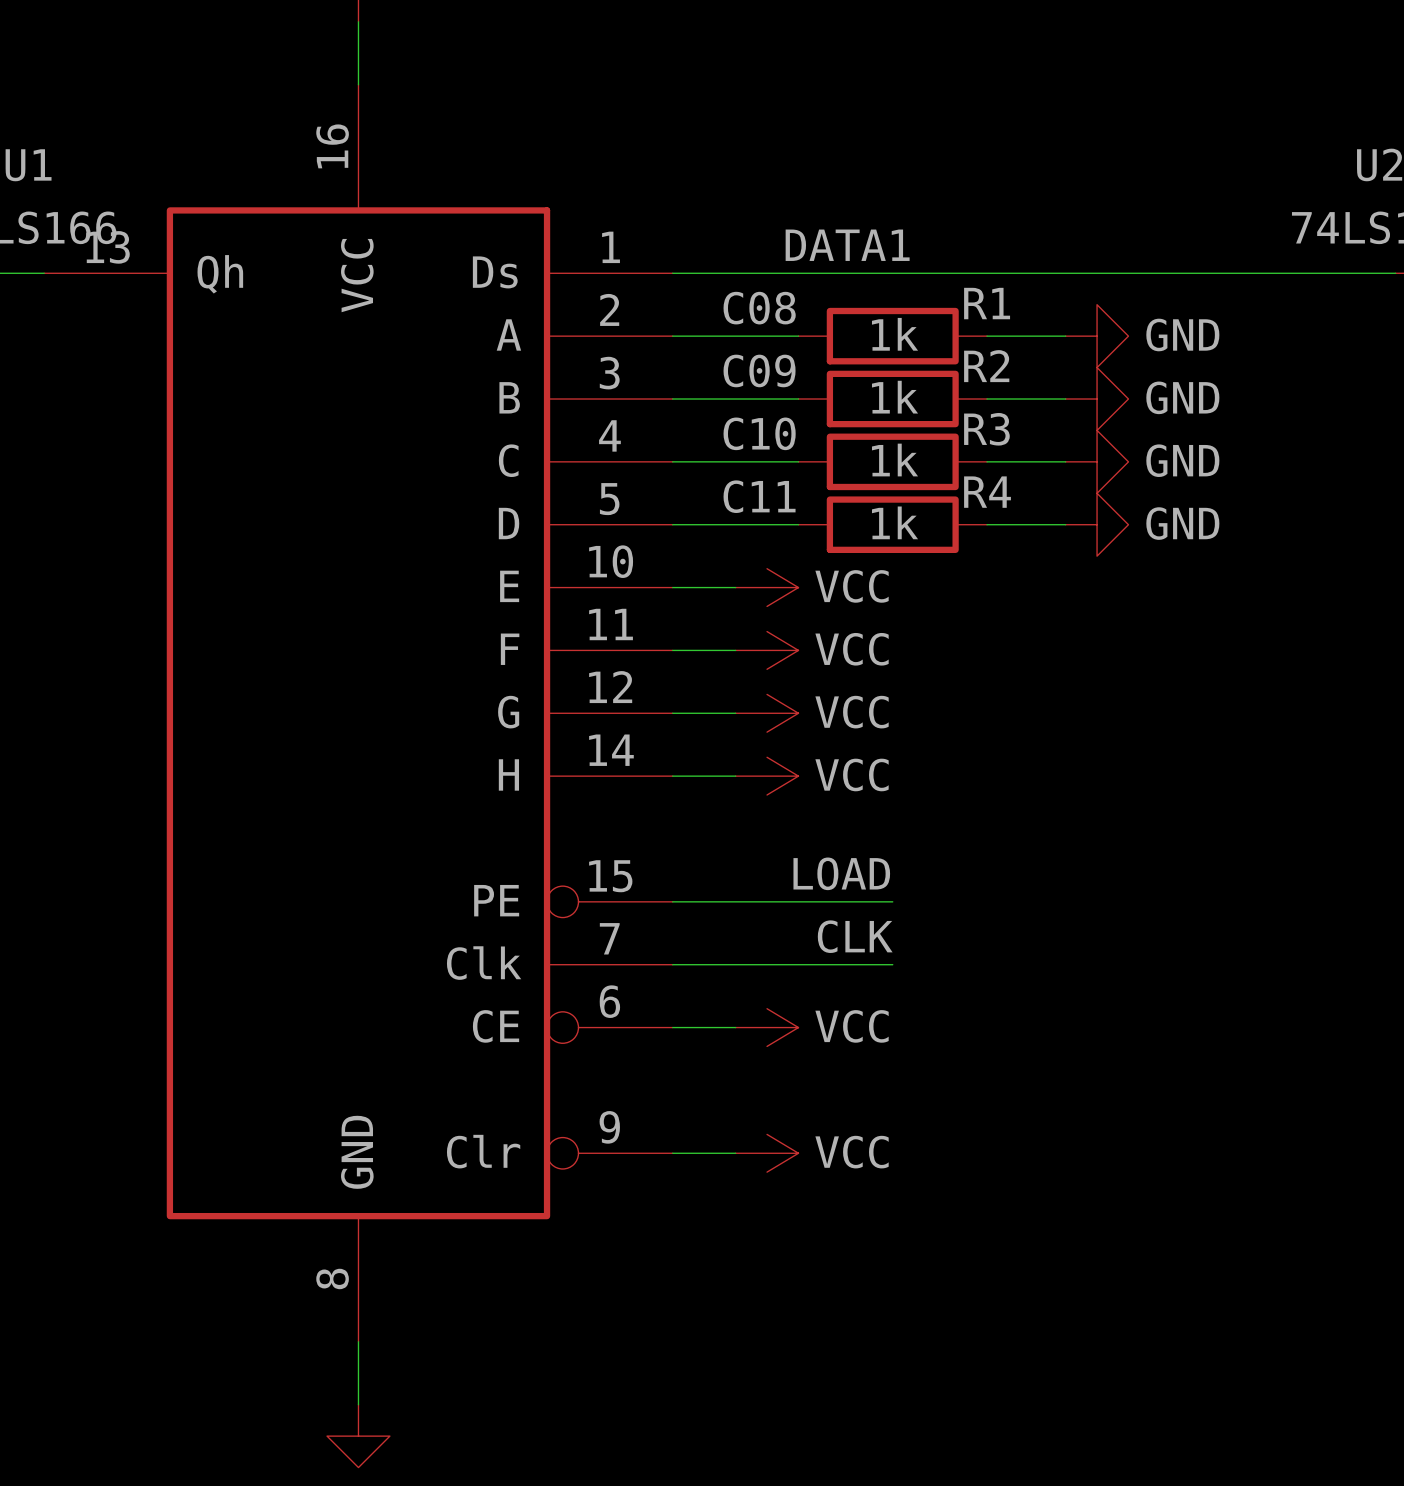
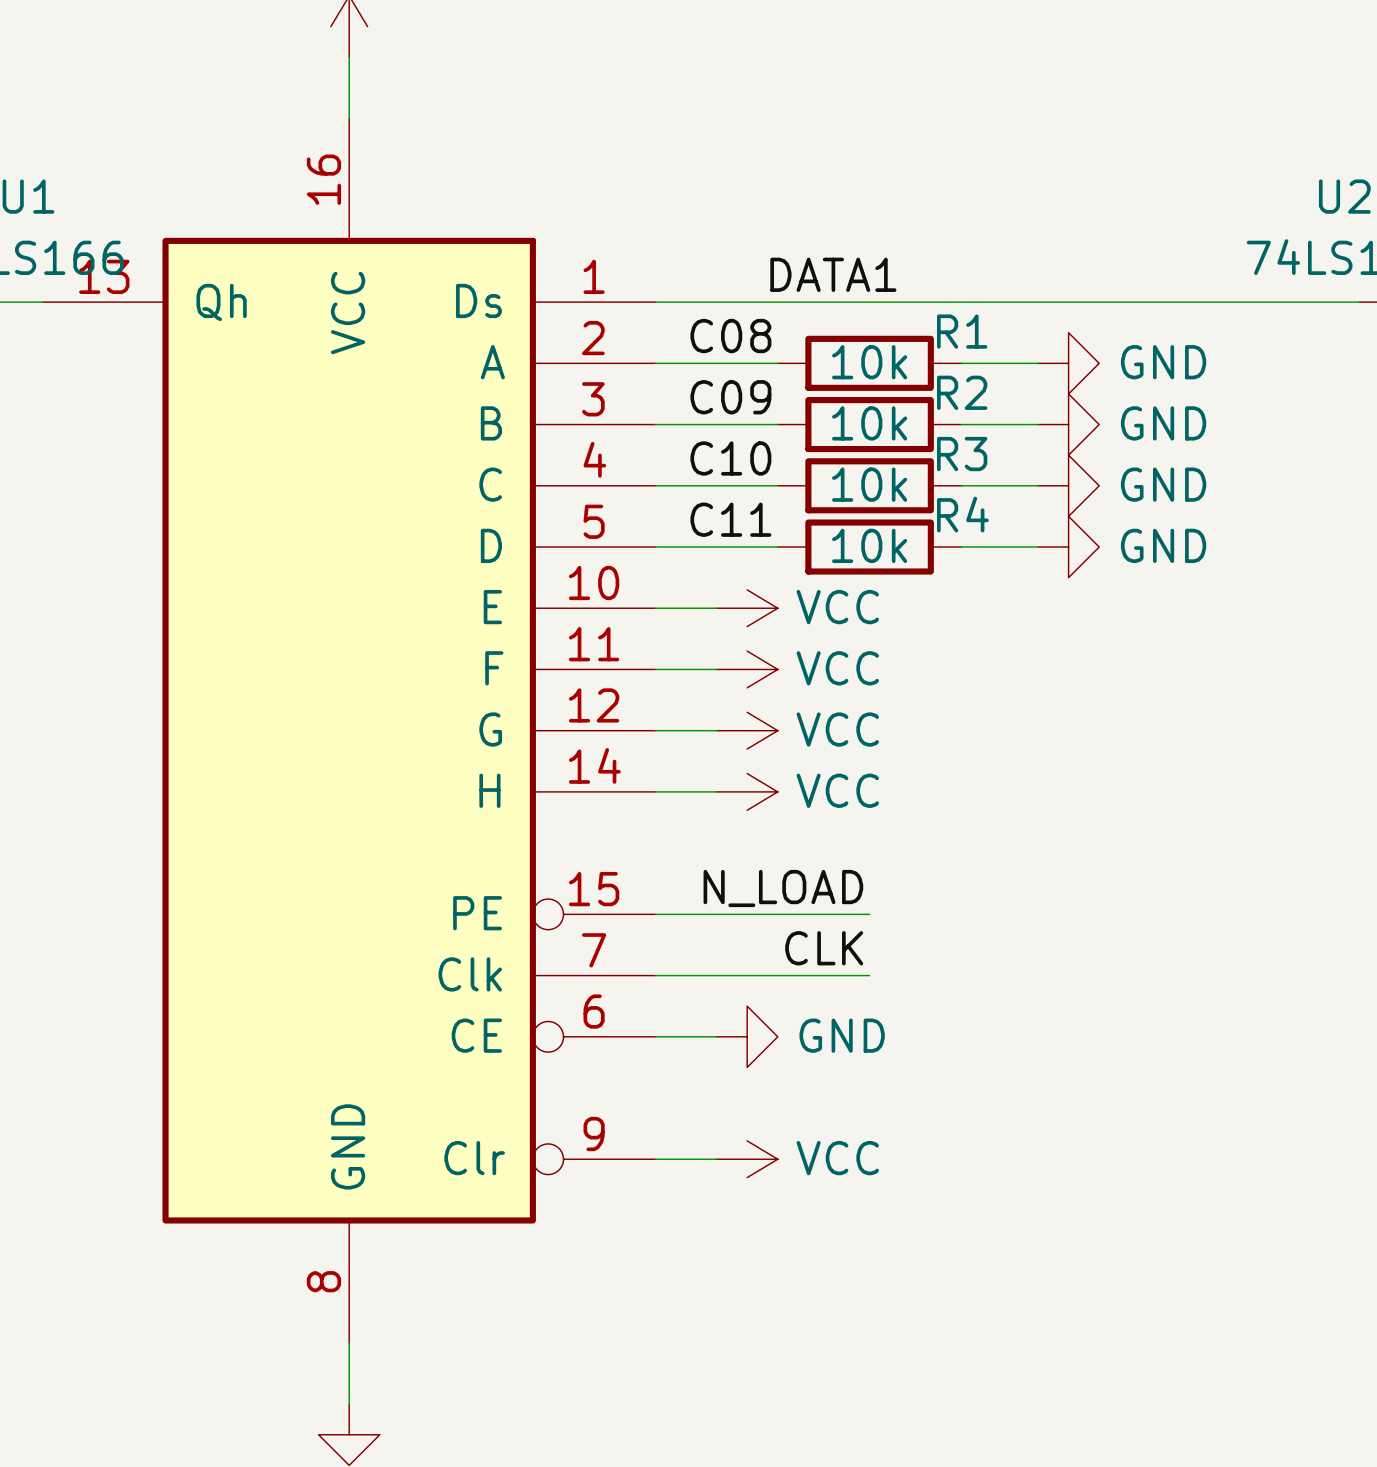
R1 value: 1k (895, 334) -> 10k (869, 362)
R2 value: 1k (895, 397) -> 10k (869, 423)
R3 value: 1k (895, 460) -> 10k (869, 484)
R4 value: 1k (895, 522) -> 10k (869, 545)
label: LOAD (841, 873) -> N_LOAD (783, 888)
power symbol: VCC (767, 1027) -> GND (747, 1036)

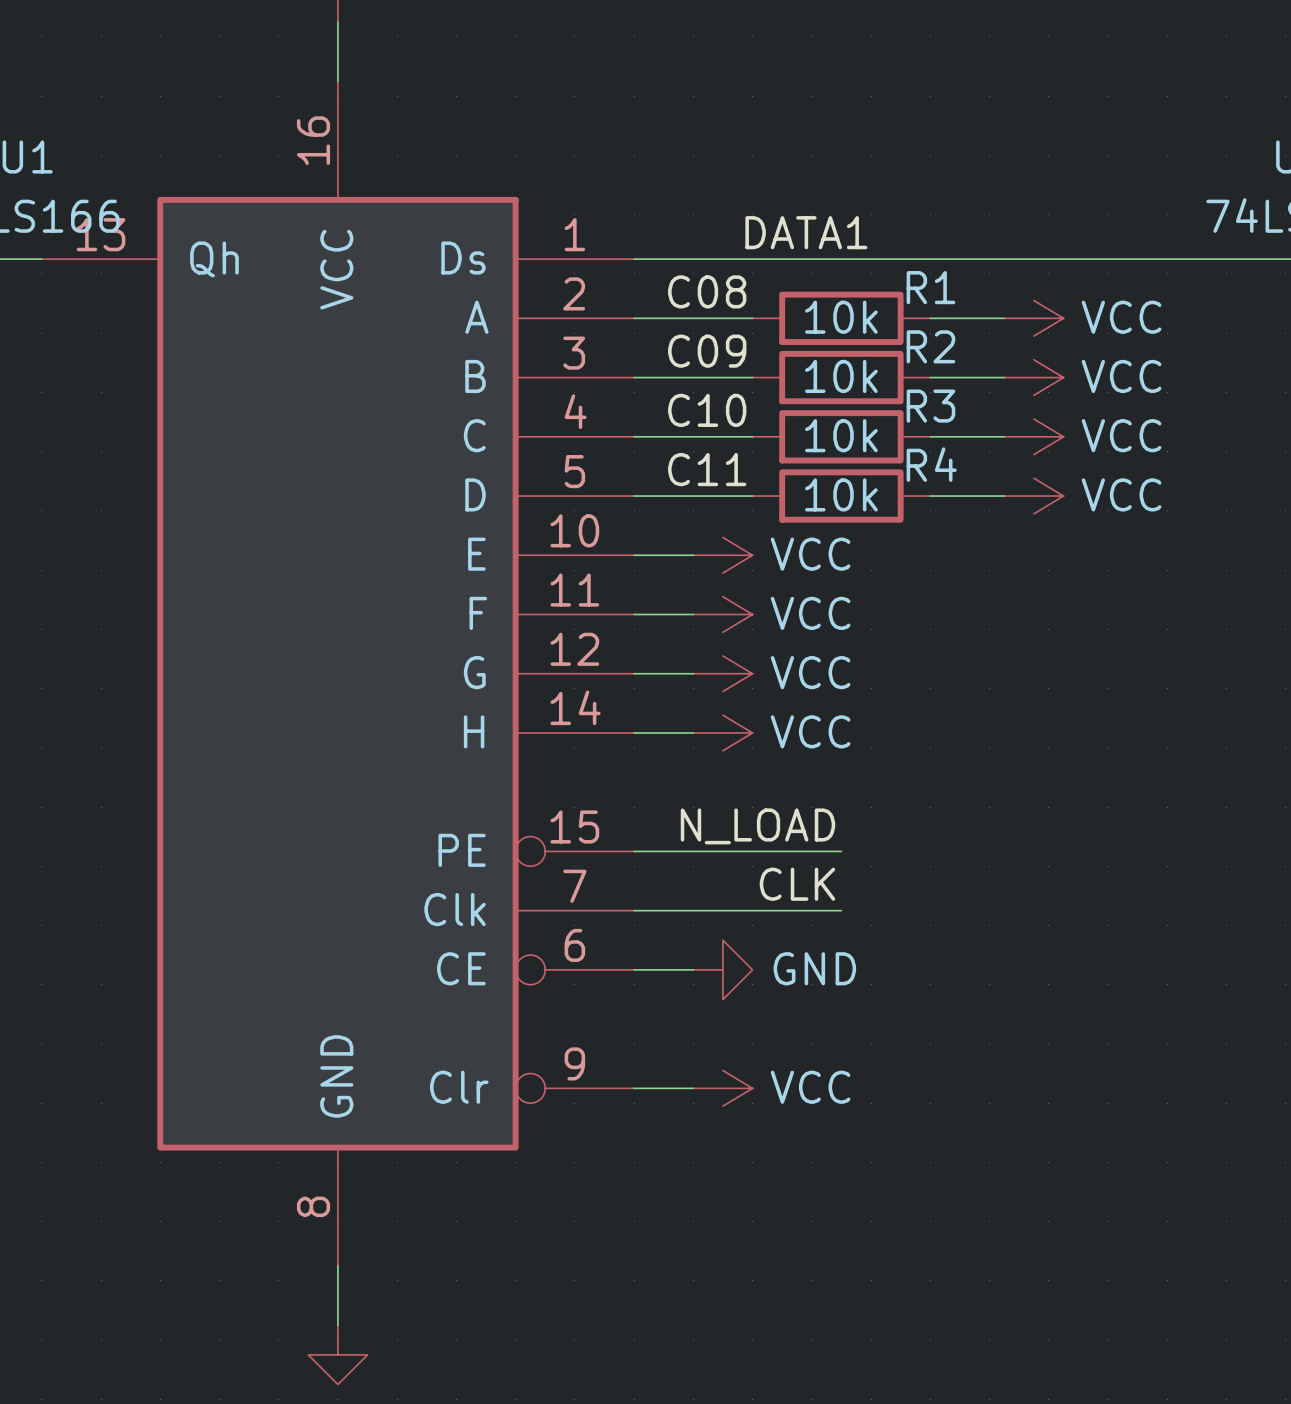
power symbol: GND (1068, 363) -> VCC (1033, 318)
power symbol: GND (1068, 424) -> VCC (1033, 377)
power symbol: GND (1068, 485) -> VCC (1033, 436)
power symbol: GND (1068, 547) -> VCC (1033, 496)

